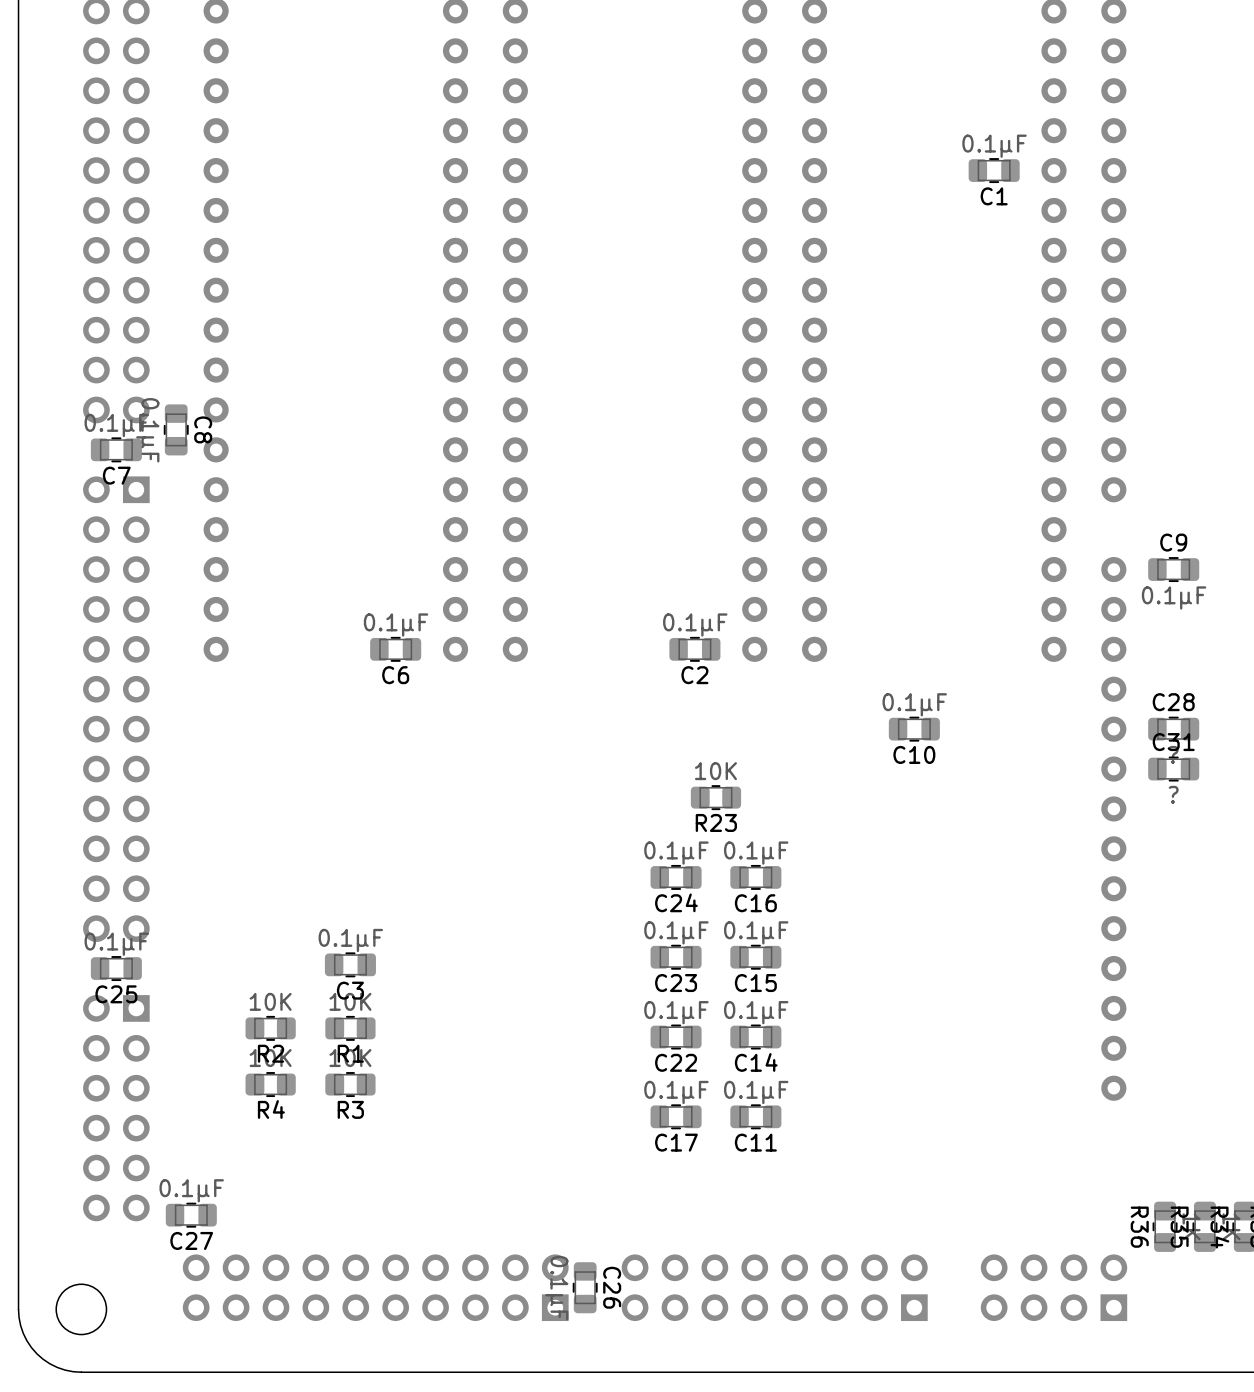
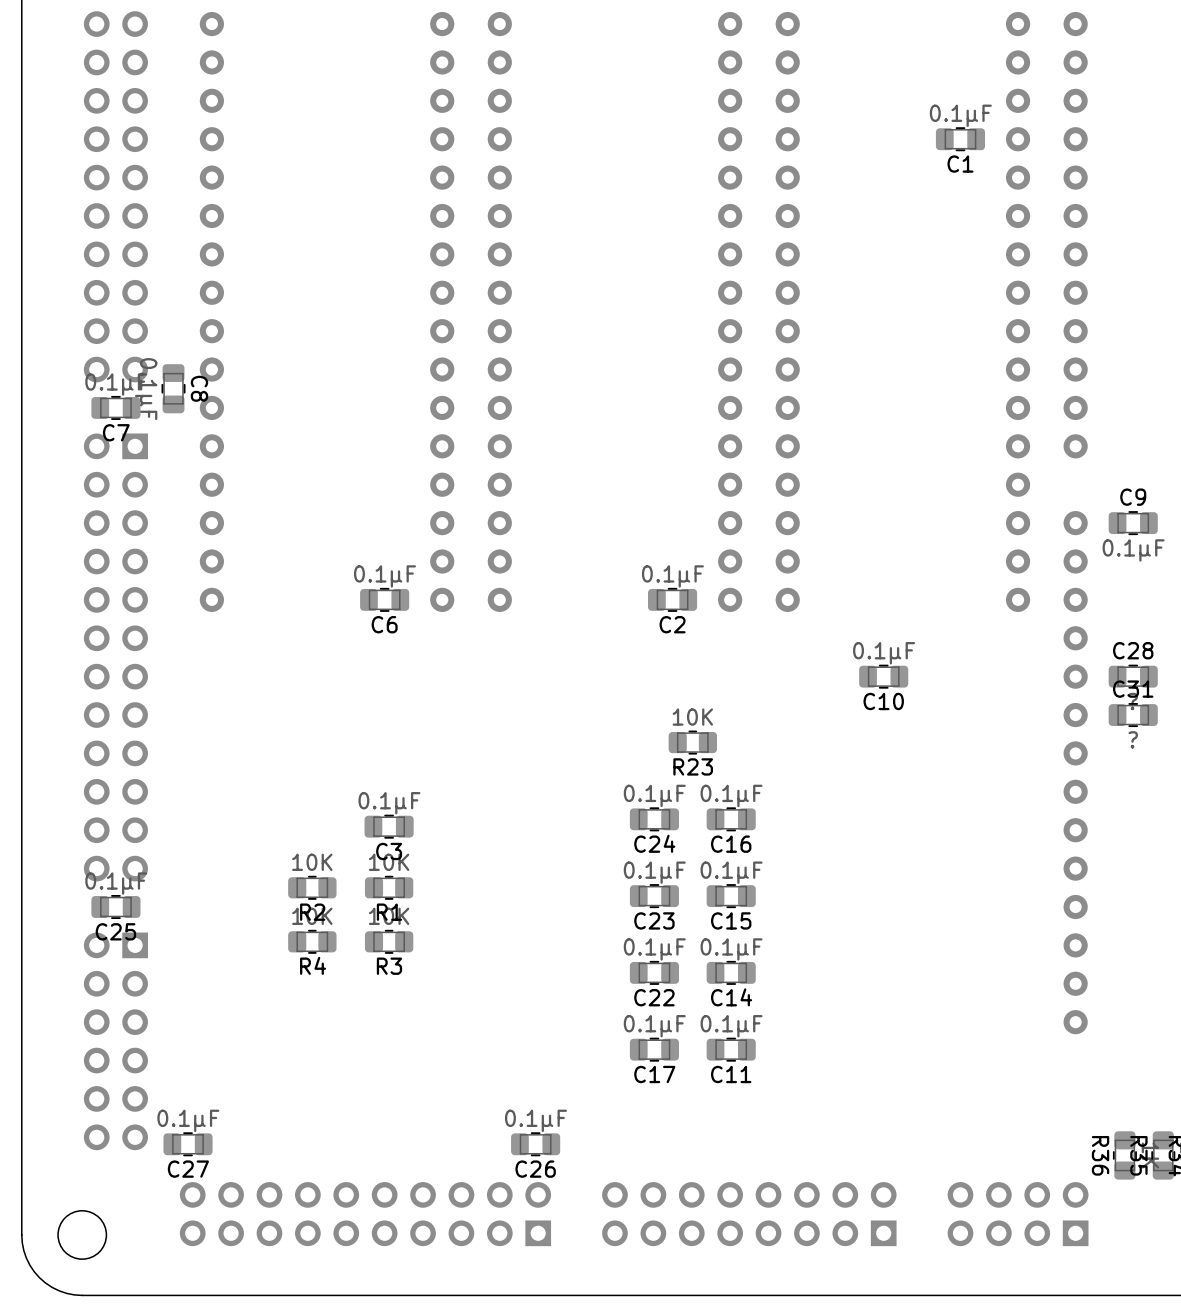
C3 position: (350, 964) -> (389, 826)
R2 position: (270, 1028) -> (312, 887)
R1 position: (350, 1028) -> (389, 887)
R4 position: (270, 1084) -> (312, 941)
R3 position: (350, 1084) -> (389, 941)
C26 rotation: 0° (585, 1287) -> 90° clockwise (535, 1144)
C26 position: (585, 1287) -> (535, 1144)

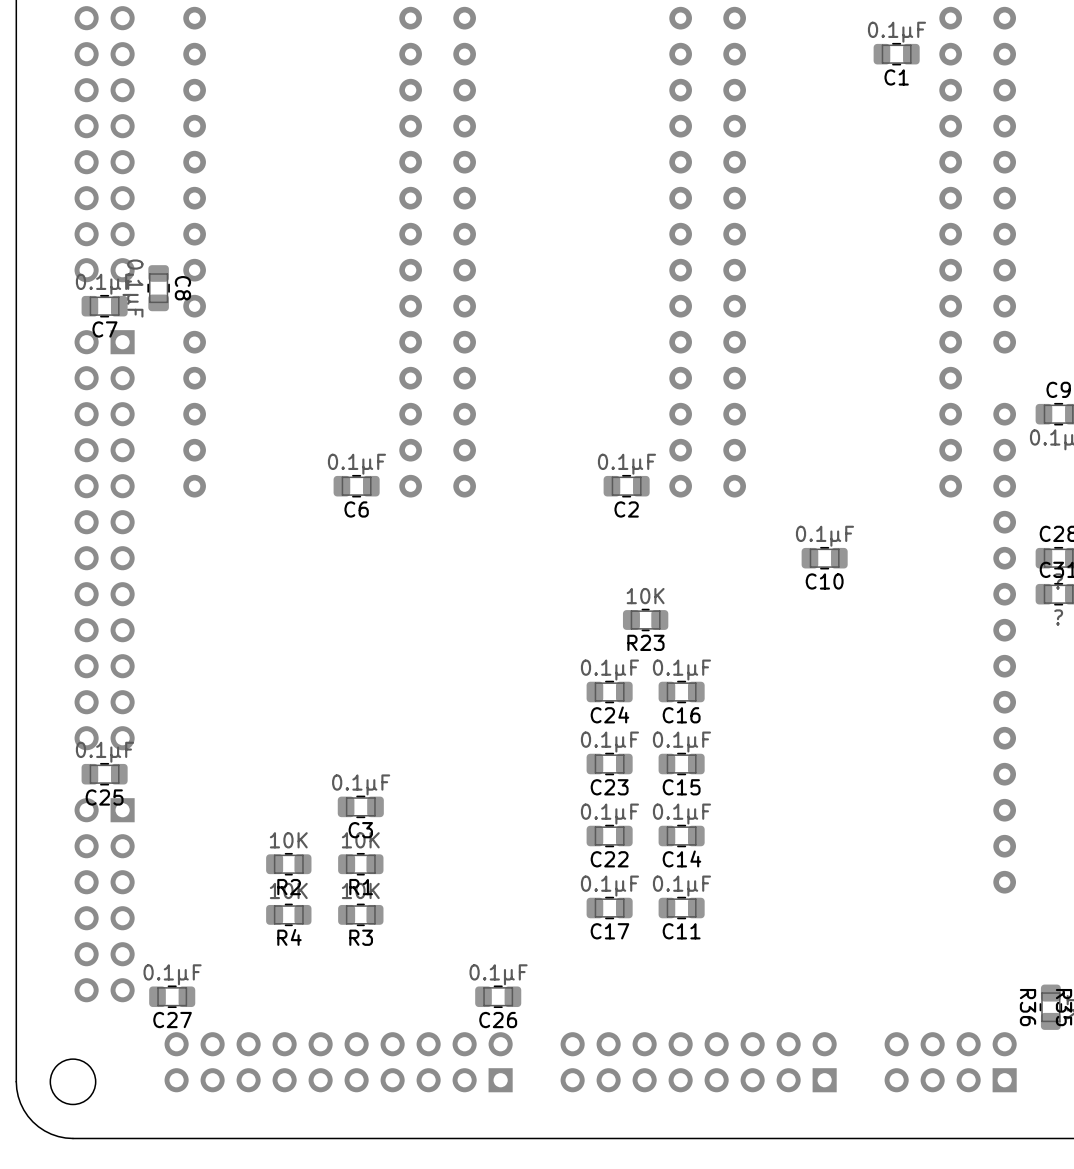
C3 position: (389, 826) -> (360, 806)
R2 position: (312, 887) -> (288, 864)
R1 position: (389, 887) -> (360, 864)
R4 position: (312, 941) -> (288, 914)
R3 position: (389, 941) -> (360, 914)

